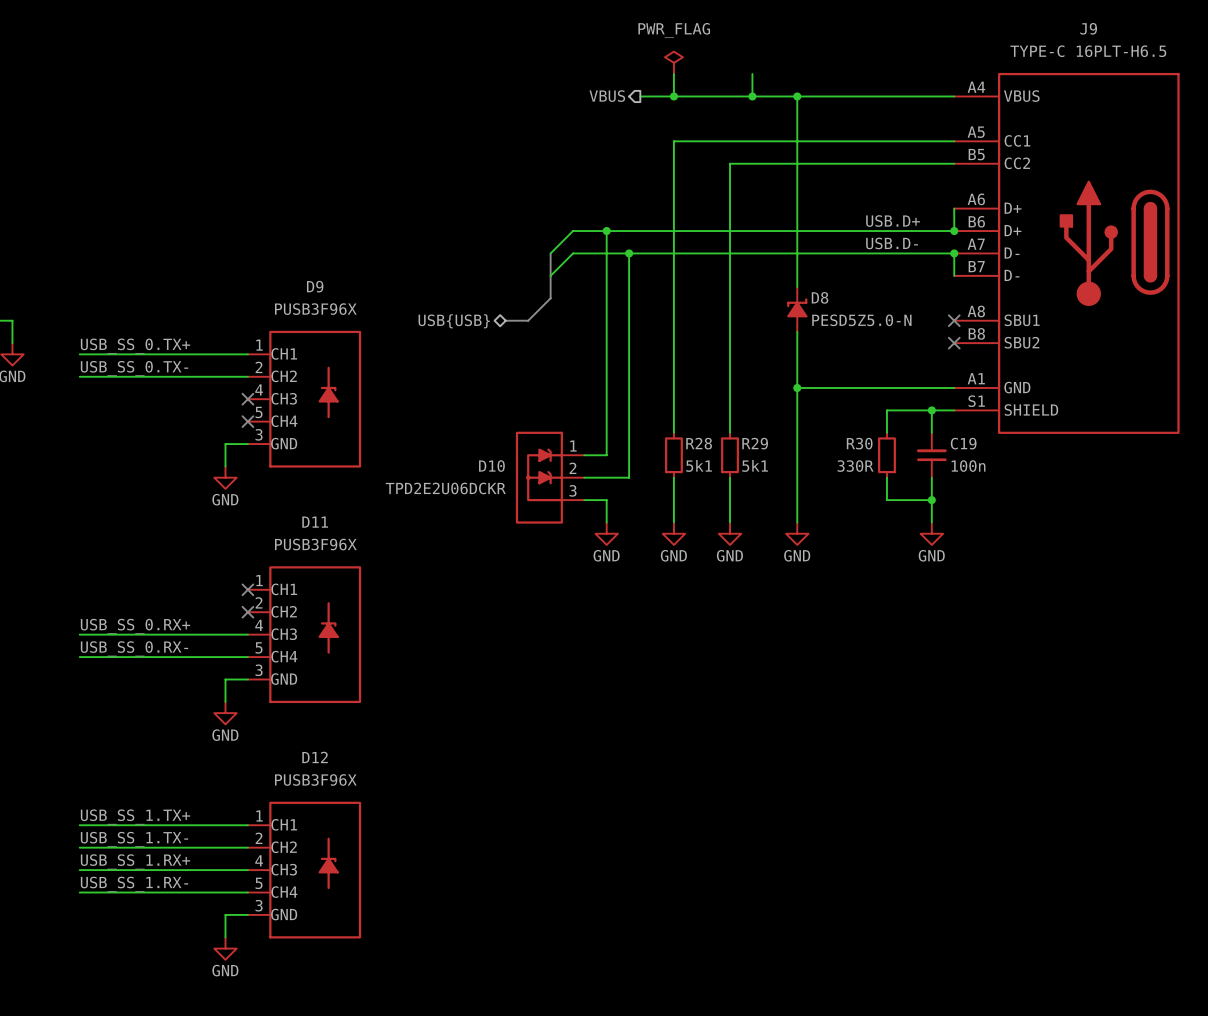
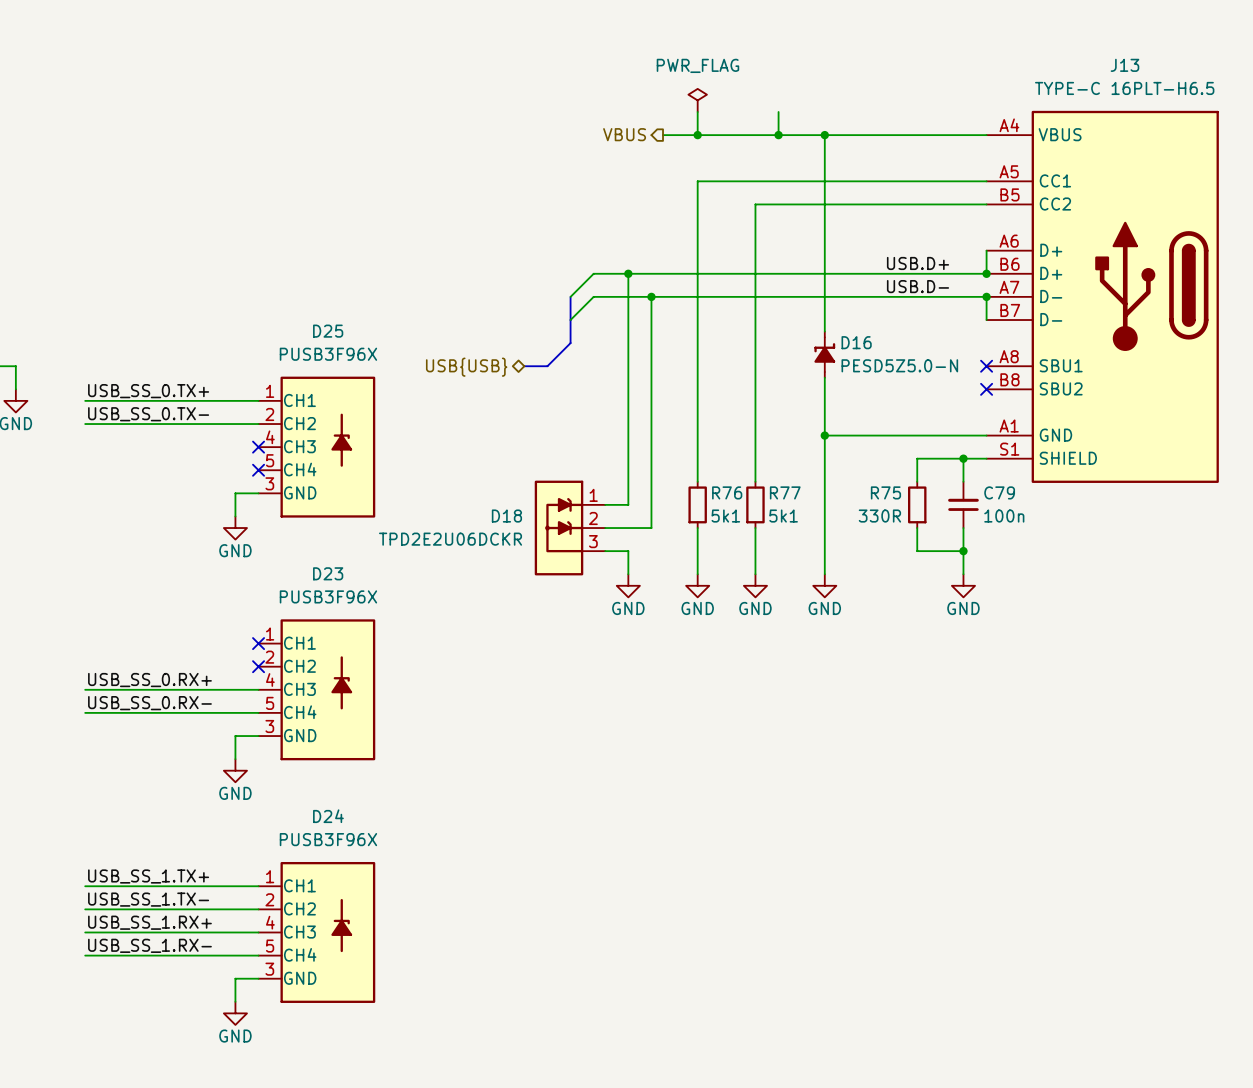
J9 name: J9 (1088, 28) -> J13 (1124, 65)
D9 name: D9 (315, 286) -> D25 (328, 331)
D8 name: D8 (820, 297) -> D16 (856, 342)
R28 name: R28 (699, 443) -> R76 (727, 492)
R29 name: R29 (755, 443) -> R77 (785, 492)
R30 name: R30 (859, 443) -> R75 (885, 492)
C19 name: C19 (963, 443) -> C79 (999, 492)
D10 name: D10 (491, 466) -> D18 (506, 516)
D11 name: D11 (315, 522) -> D23 (328, 573)
D12 name: D12 (315, 757) -> D24 (328, 816)

